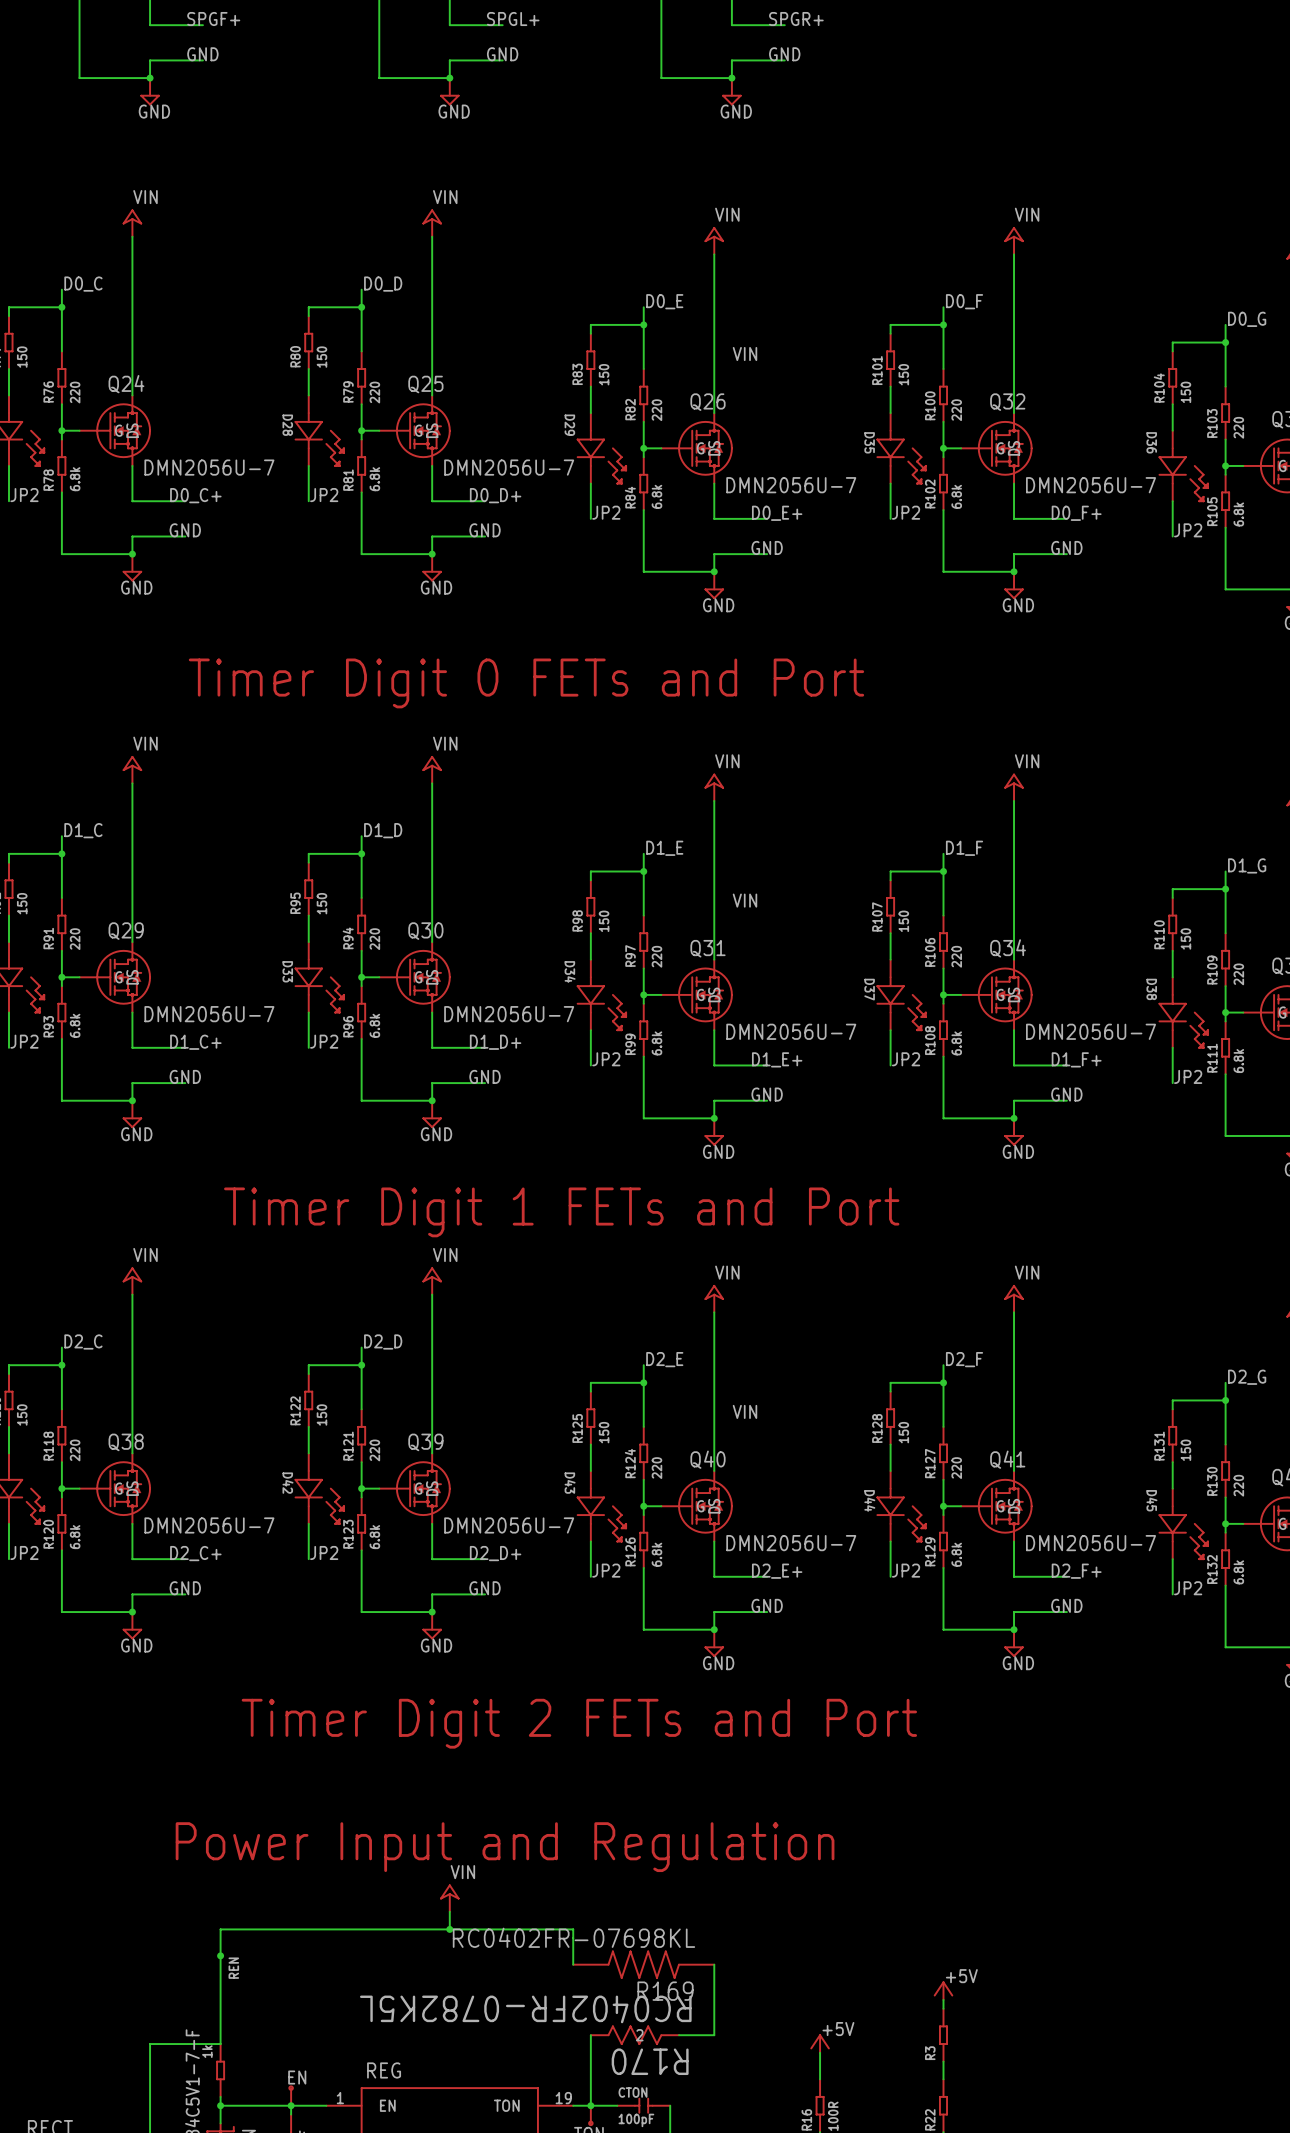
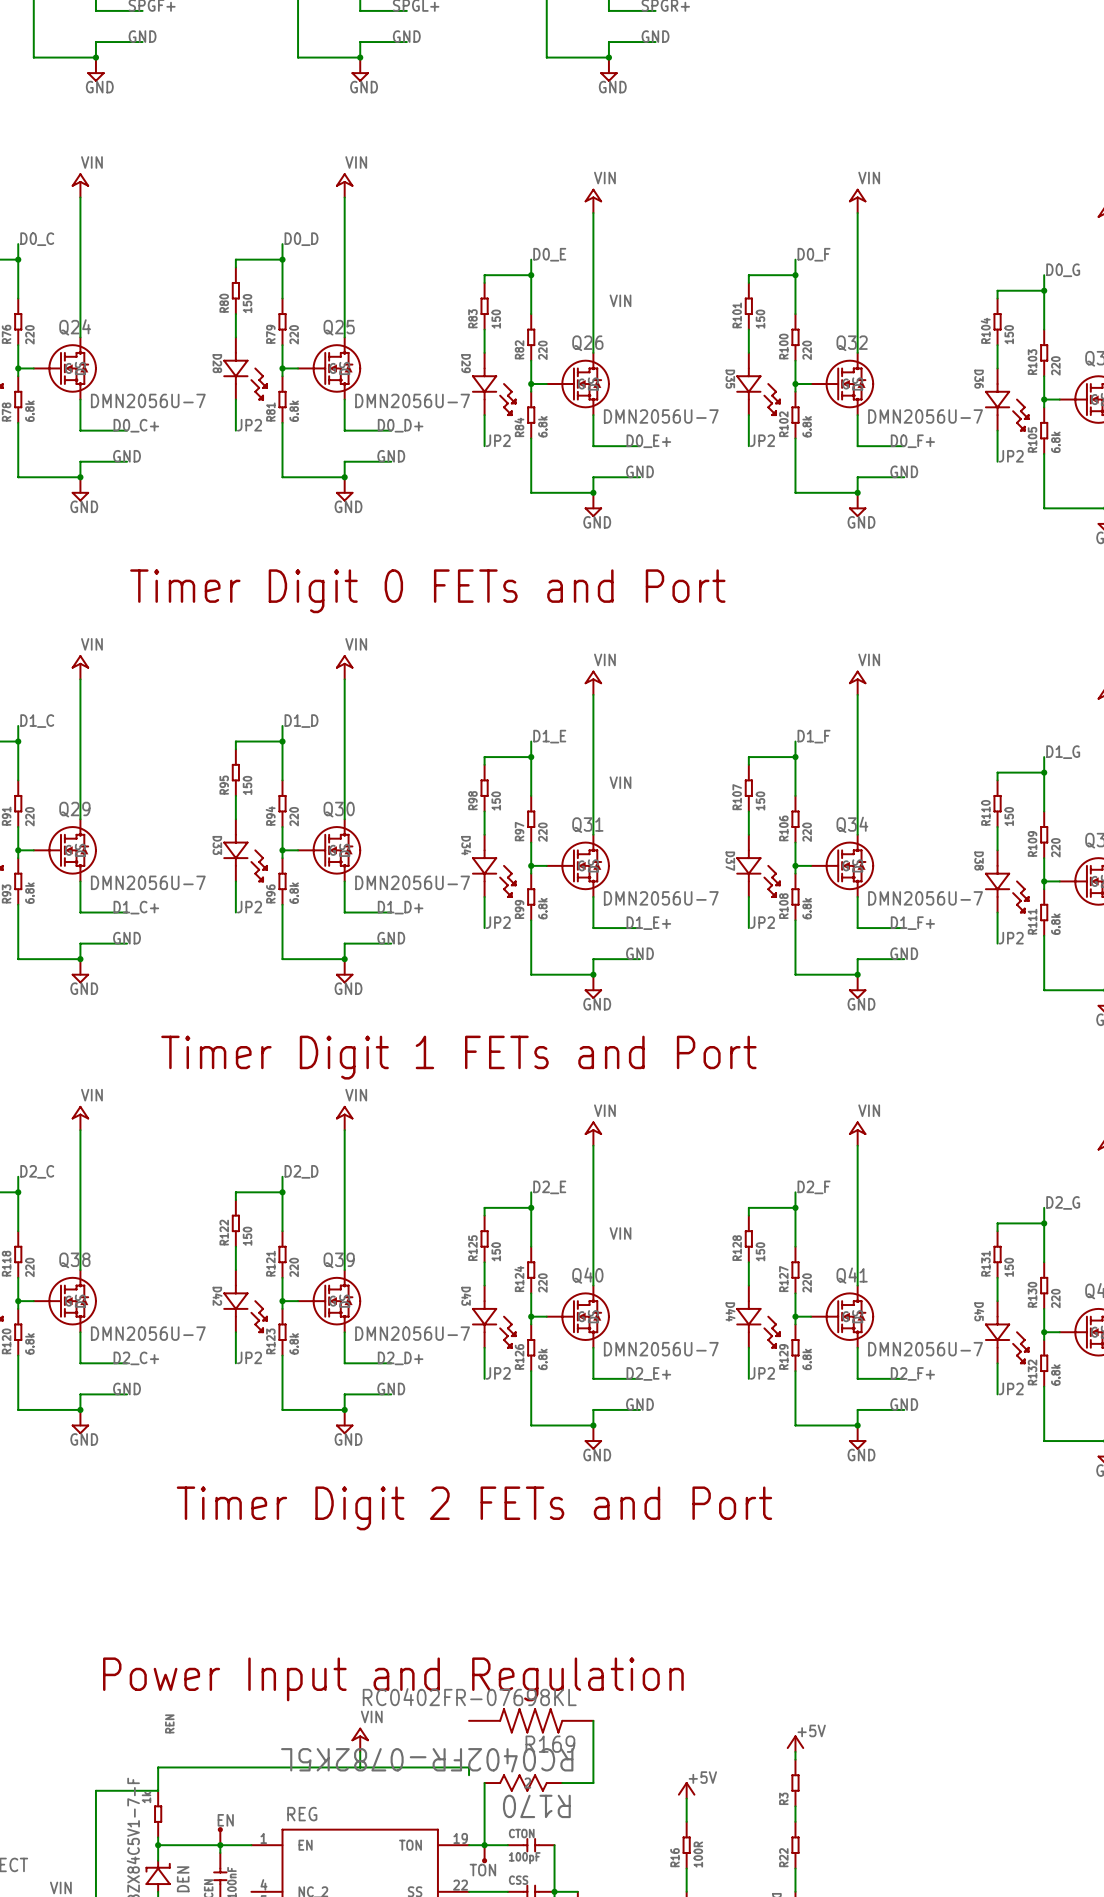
text position: Power Input and Regulation (505, 1847) -> Power Input and Regulation (393, 1679)
power symbol position: VIN (449, 1898) -> VIN (360, 1739)
wire: (449, 1911) (449, 1929) -> (360, 1751) (360, 1767)
junction: (449, 1929) -> none
junction: (220, 1955) -> none
wire: (573, 1964) (573, 1929) (220, 1929) (220, 2017) -> (469, 1775) (469, 1767) (158, 1767)

